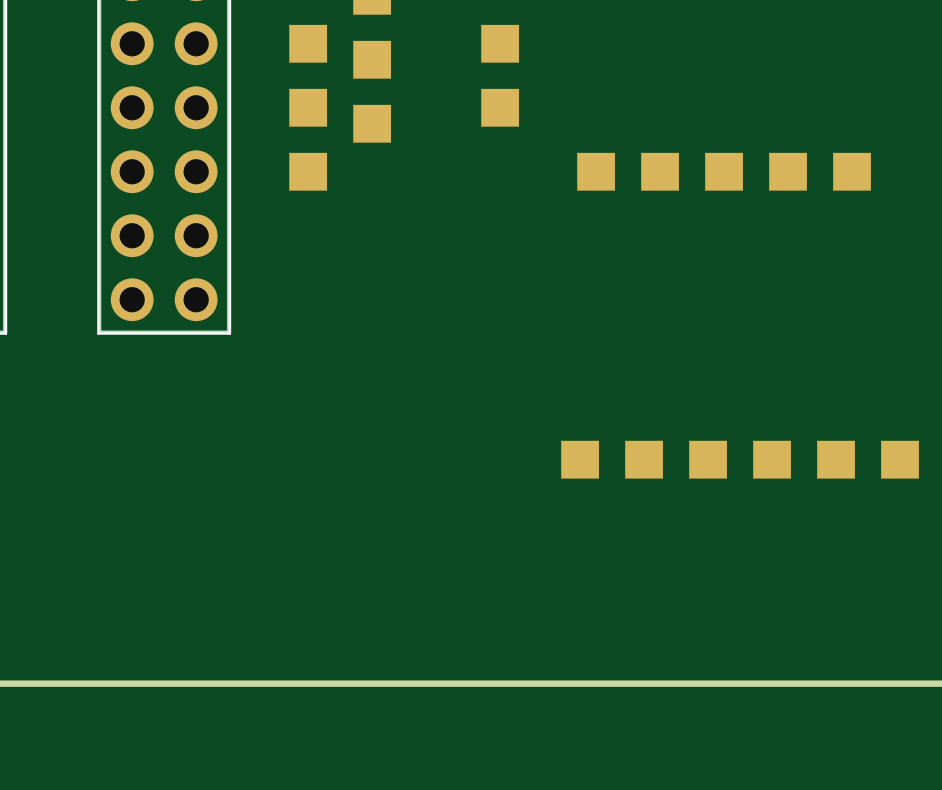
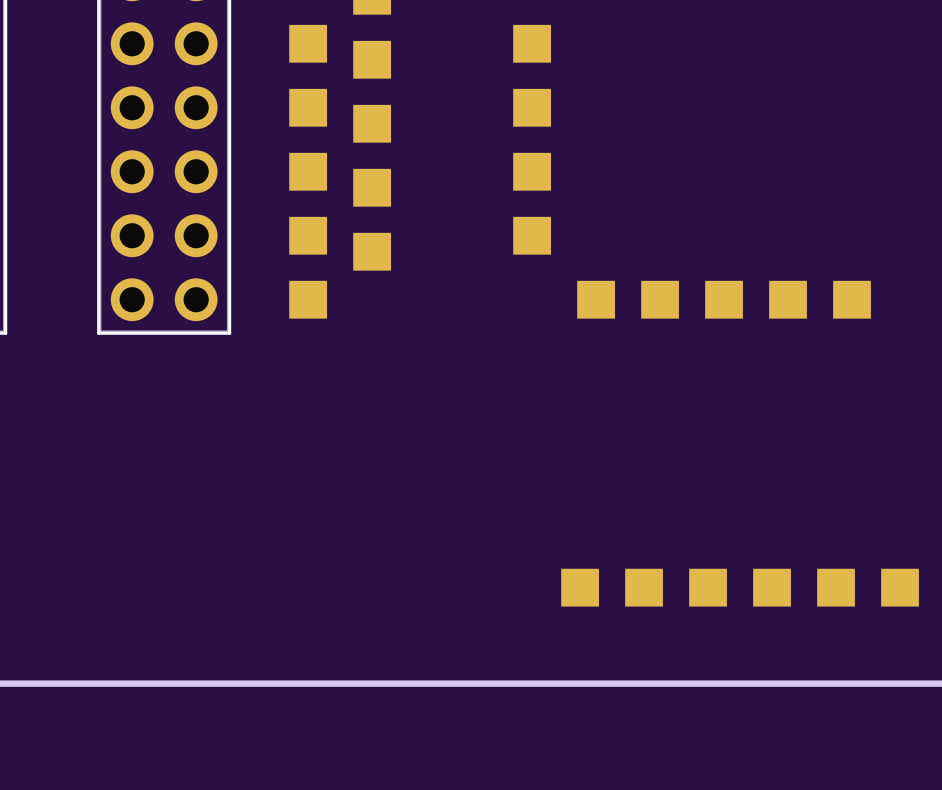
part position: (500, 43) -> (532, 43)
part position: (500, 107) -> (532, 107)
part: none -> (532, 171)
part: (596, 171) -> none
part: (660, 171) -> none
part: (724, 171) -> none
part: (788, 171) -> none
part: (852, 171) -> none
part: none -> (372, 187)
part: none -> (308, 235)
part: none -> (532, 235)
part: none -> (372, 251)
part: none -> (308, 299)
part: none -> (596, 299)
part: none -> (660, 299)
part: none -> (724, 299)
part: none -> (788, 299)
part: none -> (852, 299)
part: (580, 459) -> none
part: (644, 459) -> none
part: (708, 459) -> none
part: (772, 459) -> none
part: (836, 459) -> none
part: (900, 459) -> none
part: none -> (580, 587)
part: none -> (644, 587)
part: none -> (708, 587)
part: none -> (772, 587)
part: none -> (836, 587)
part: none -> (900, 587)

